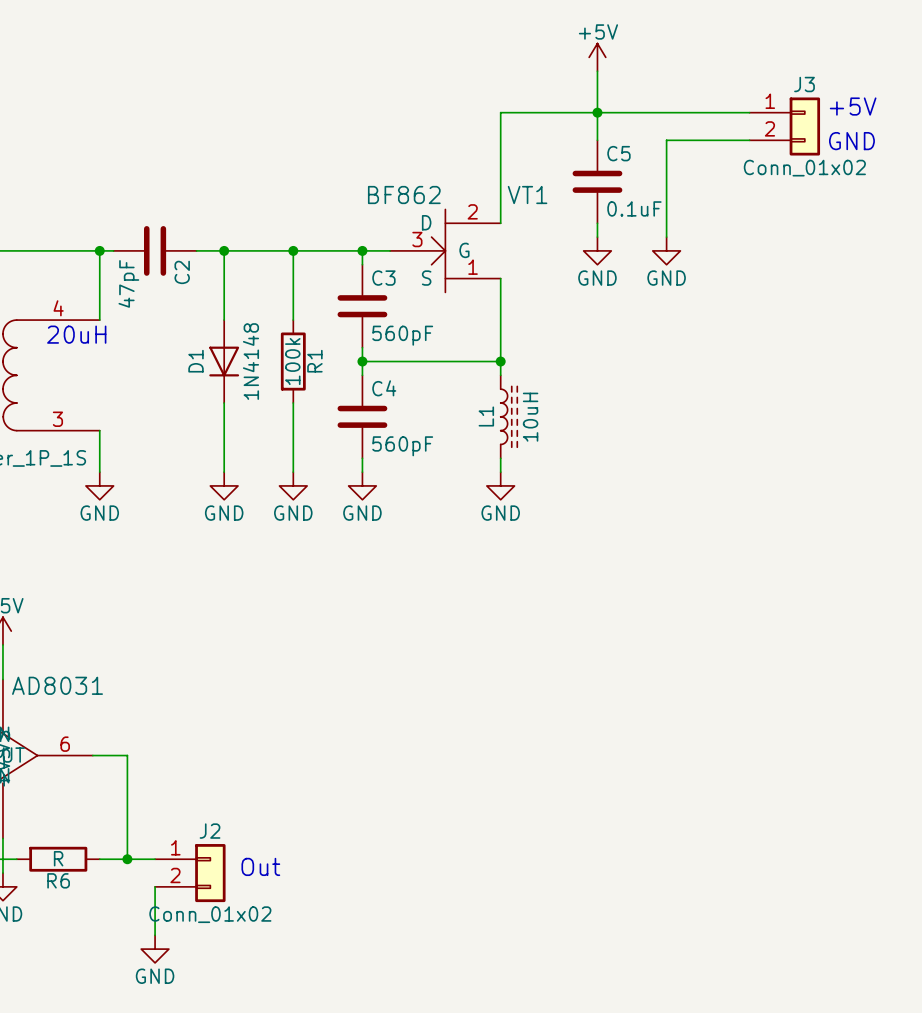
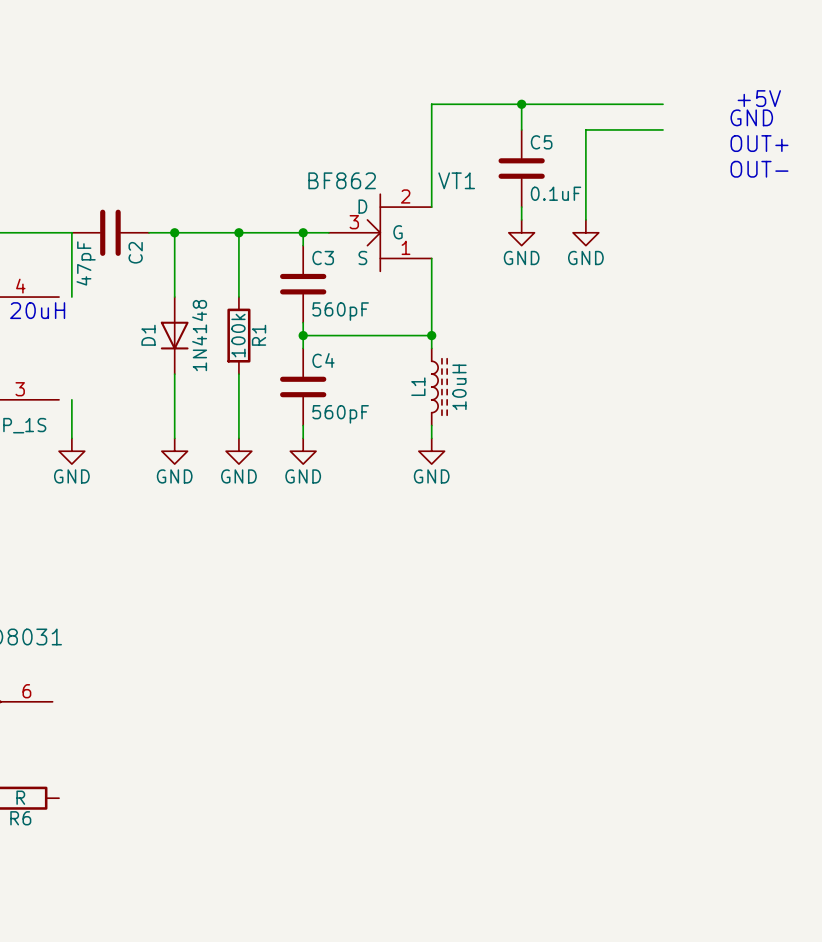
power symbol: +5V (597, 57) -> none
wire: (597, 71) (597, 112) -> none
J3: Conn_01x02 (784, 126) -> none
text position: GND (851, 141) -> GND (751, 117)
text: none -> OUT+ (759, 143)
text: none -> OUT- (759, 169)
wire: (99, 250) (99, 320) -> (71, 232) (71, 297)
junction: (99, 250) -> none
wire: (99, 430) (99, 472) -> (71, 399) (71, 438)
power symbol position: GND (99, 485) -> GND (71, 451)
wire: (92, 755) (127, 755) (127, 859) -> none
wire: (99, 859) (155, 859) -> none
junction: (127, 859) -> none
text: Out (260, 866) -> none
J2: Conn_01x02 (190, 873) -> none
wire: (155, 886) (155, 935) -> none
power symbol: GND (155, 949) -> none

